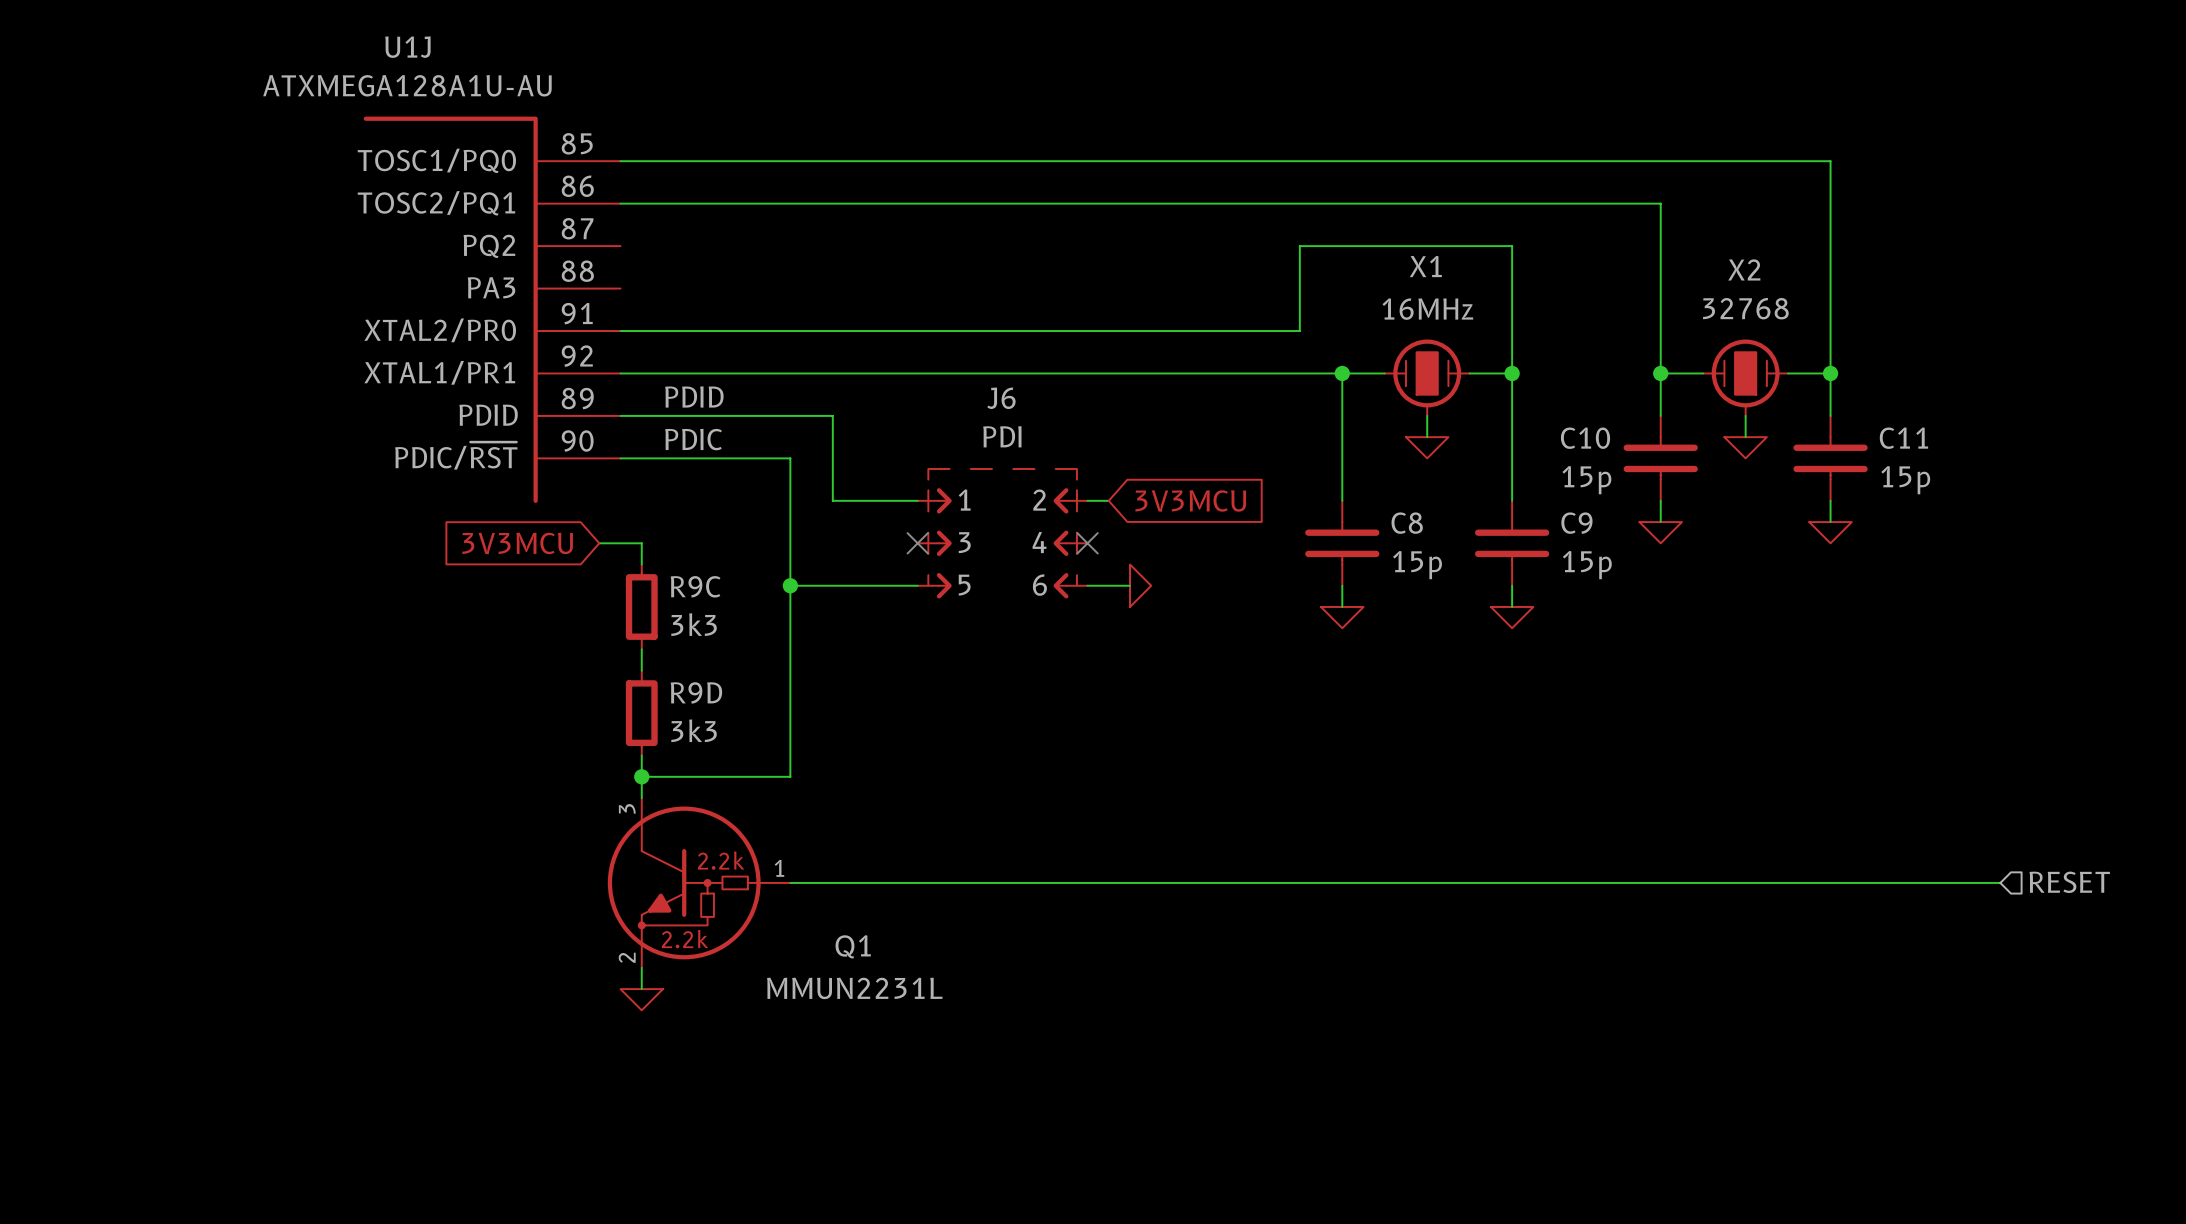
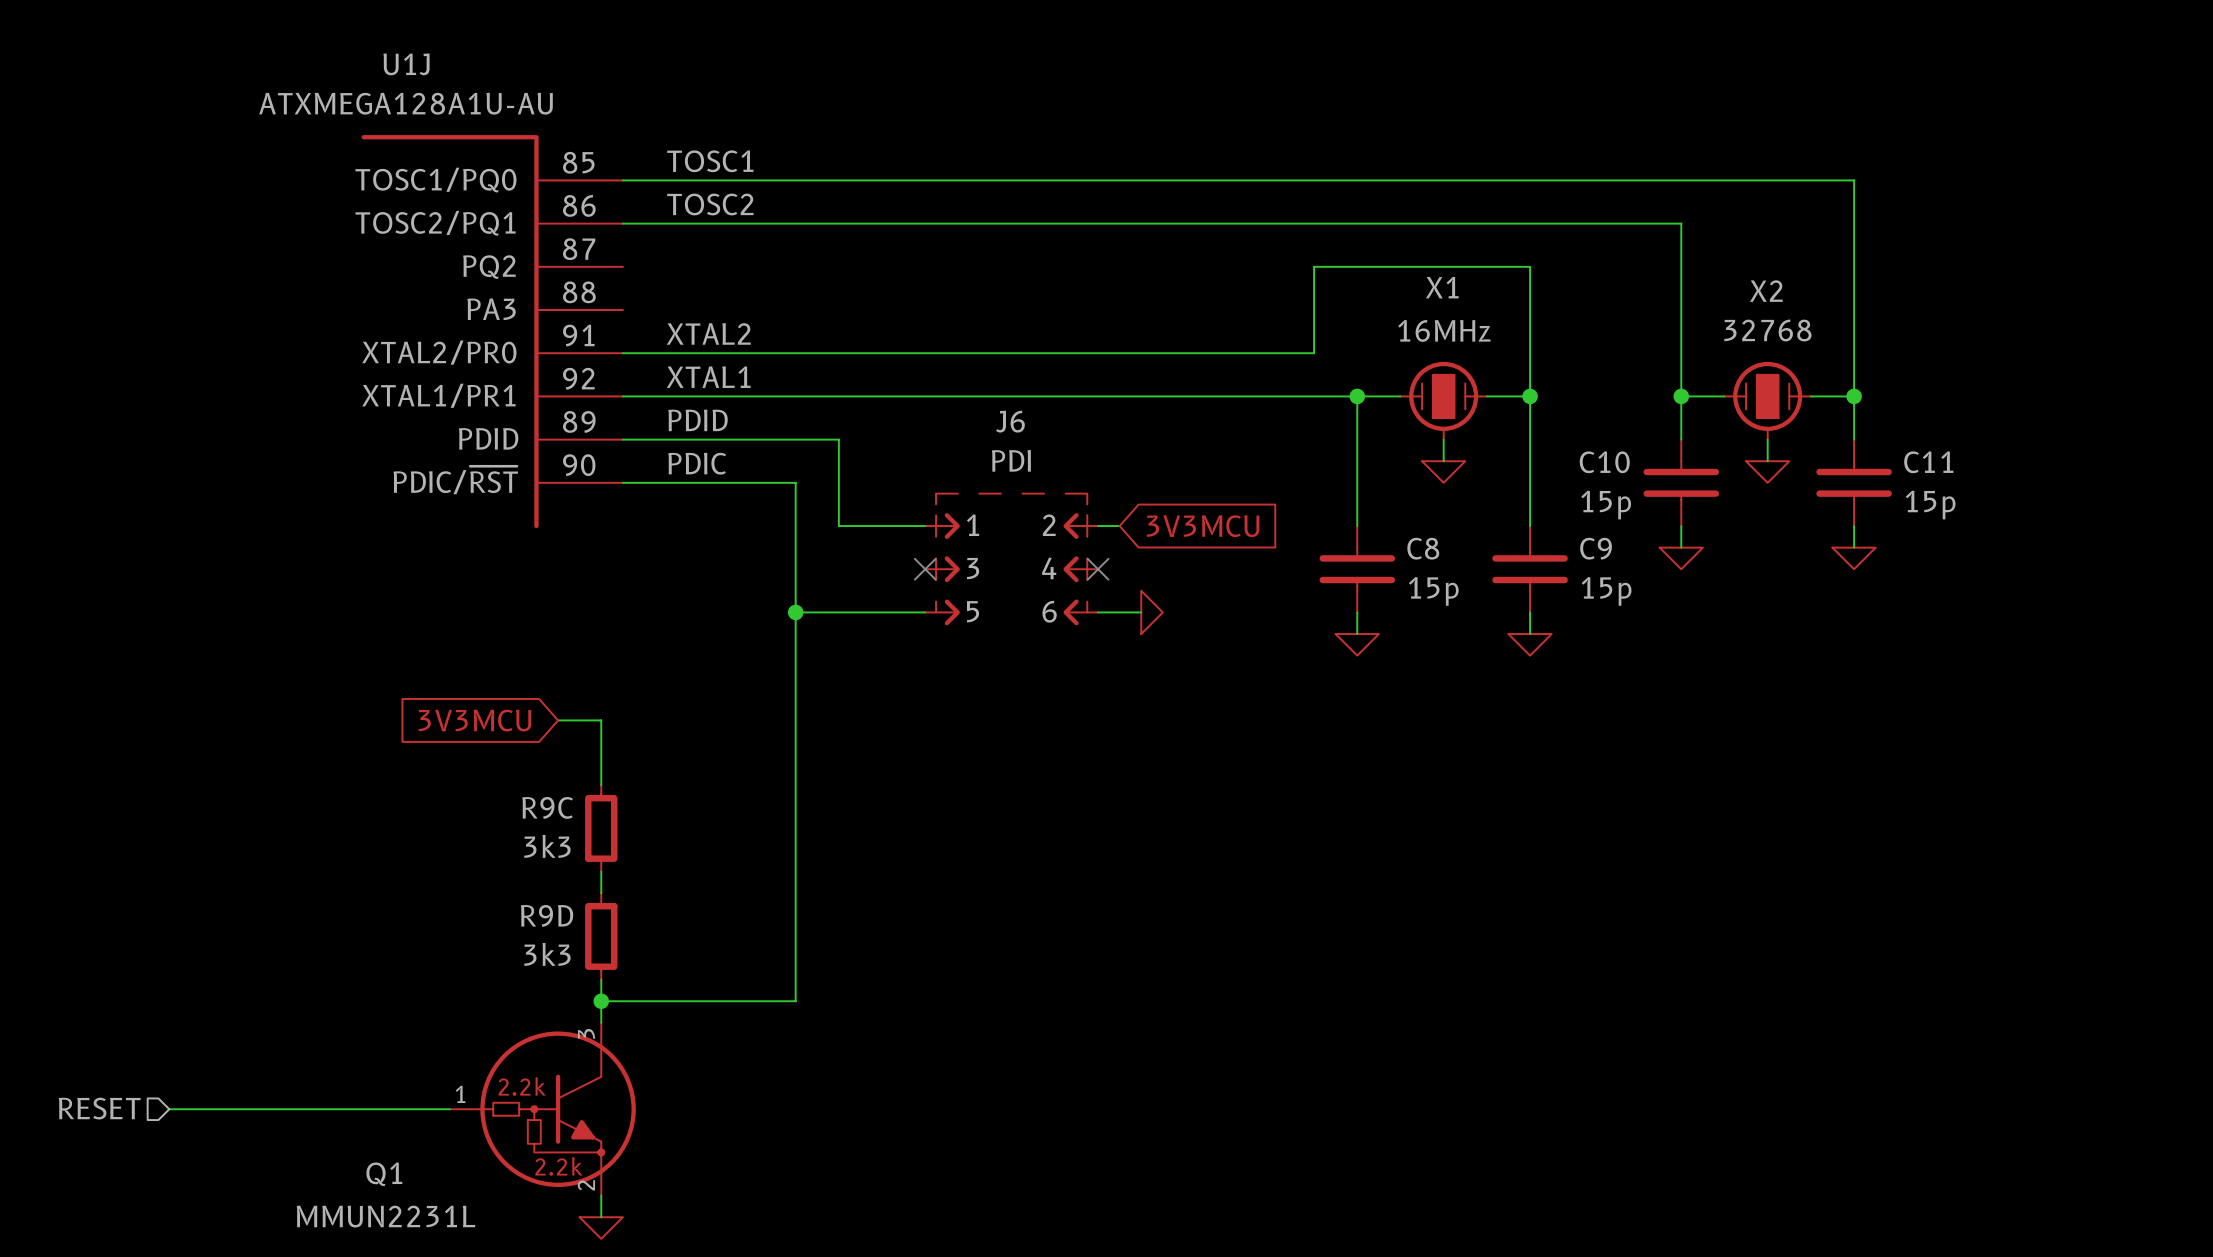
label: none -> TOSC1 (710, 161)
label: none -> TOSC2 (710, 204)
label: none -> XTAL2 (708, 333)
label: none -> XTAL1 (708, 377)
global label position: 3V3MCU (517, 543) -> 3V3MCU (474, 720)
wire: (599, 543) (641, 543) (641, 564) -> none
R9C name position: R9C (695, 586) -> R9C (547, 807)
R9C position: (641, 606) -> (601, 828)
R9C value position: 3k3 (694, 624) -> 3k3 (547, 846)
wire: (641, 649) (641, 670) -> (601, 871) (601, 893)
wire: none -> (558, 720) (601, 720) (601, 785)
R9D name position: R9D (696, 692) -> R9D (547, 915)
R9D position: (641, 713) -> (601, 936)
R9D value position: 3k3 (694, 730) -> 3k3 (547, 954)
wire: (641, 755) (641, 798) -> (601, 979) (601, 1022)
wire: (641, 776) (790, 776) -> (601, 1001) (795, 1001) (795, 806)
junction: (641, 776) -> none
Q1 flip: as is (688, 882) -> left-right (553, 1109)
Q1 position: (699, 882) -> (542, 1109)
wire: (790, 882) (2000, 882) -> none
hierarchical label: RESET (2069, 882) -> none
junction: none -> (601, 1001)
wire: (641, 967) (641, 989) -> (601, 1195) (601, 1217)
power symbol position: (641, 999) -> (601, 1228)
hierarchical label: none -> RESET (99, 1108)
wire: none -> (169, 1109) (450, 1109)

